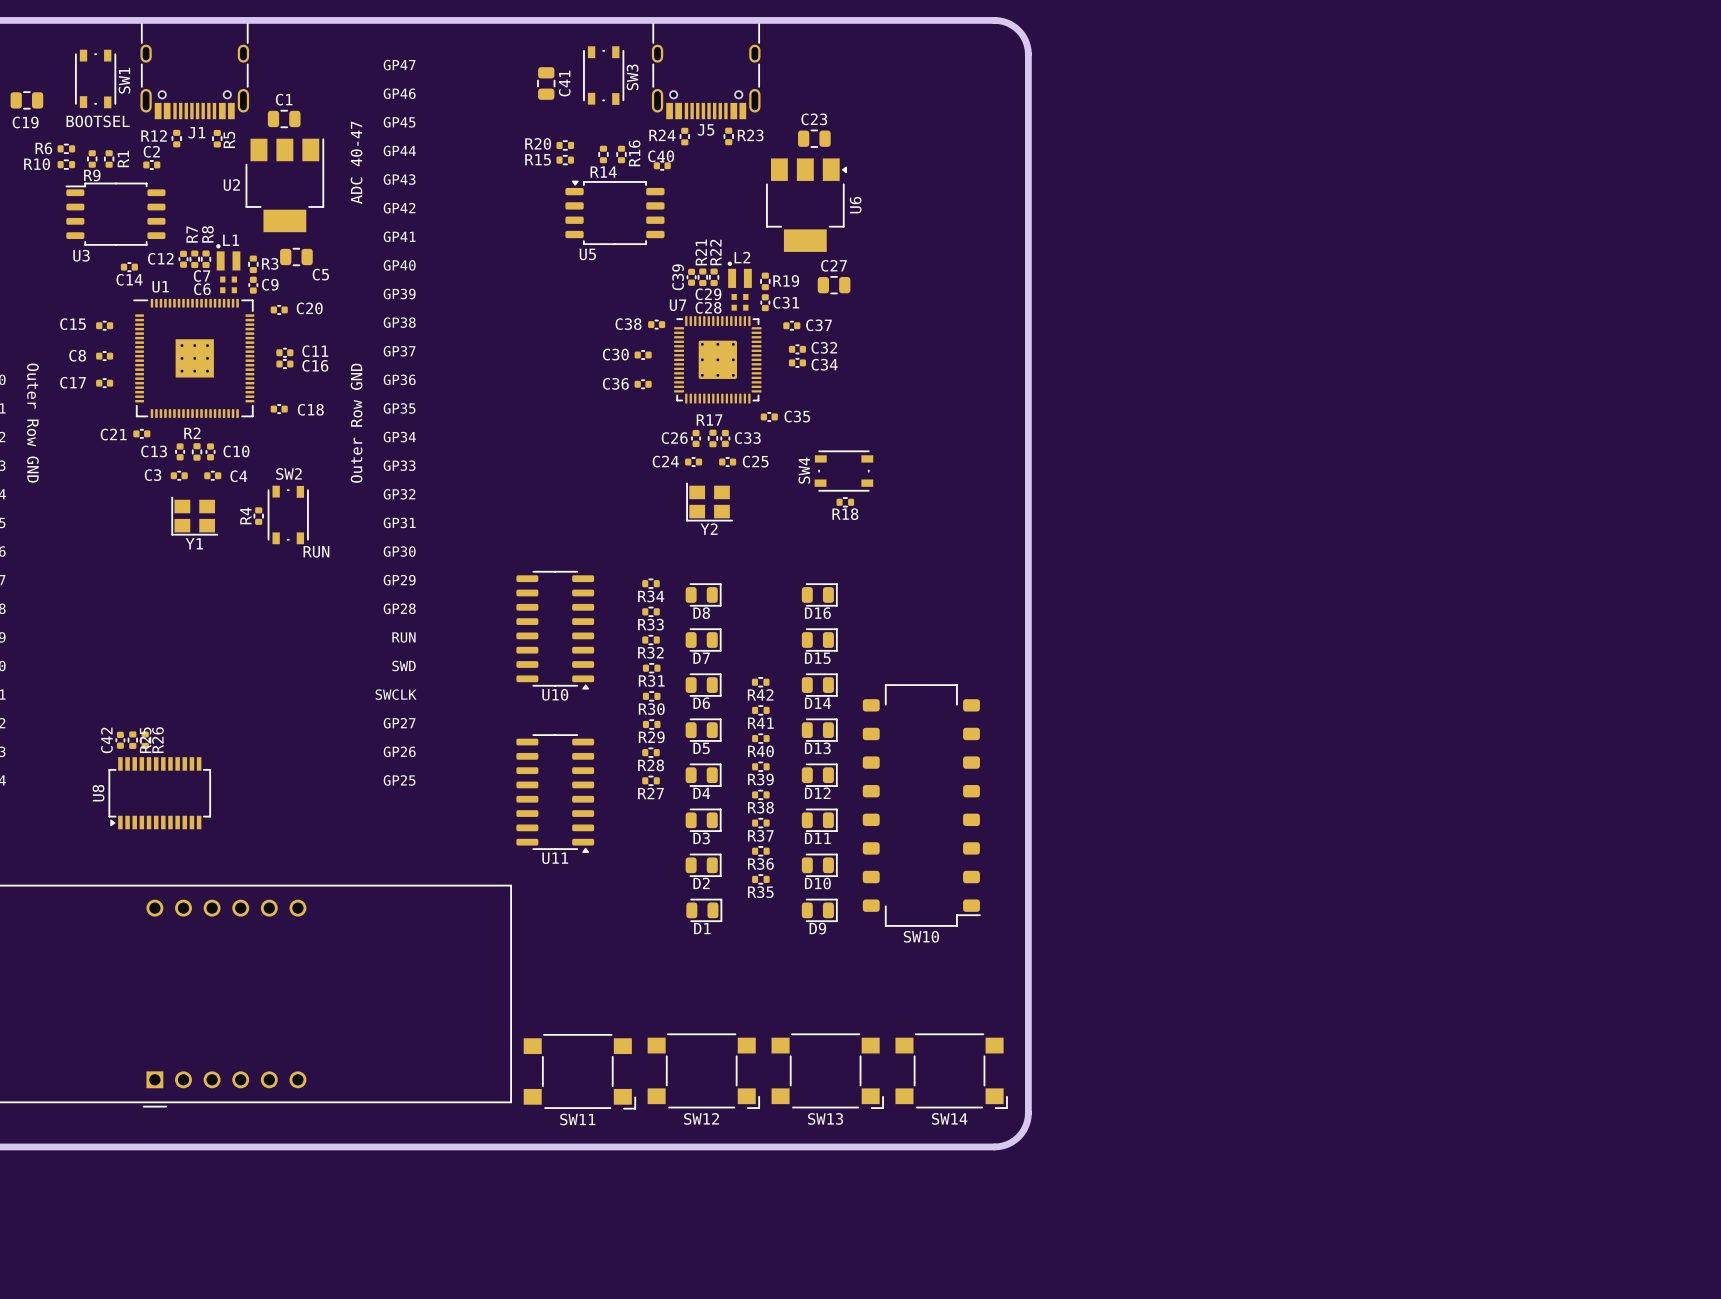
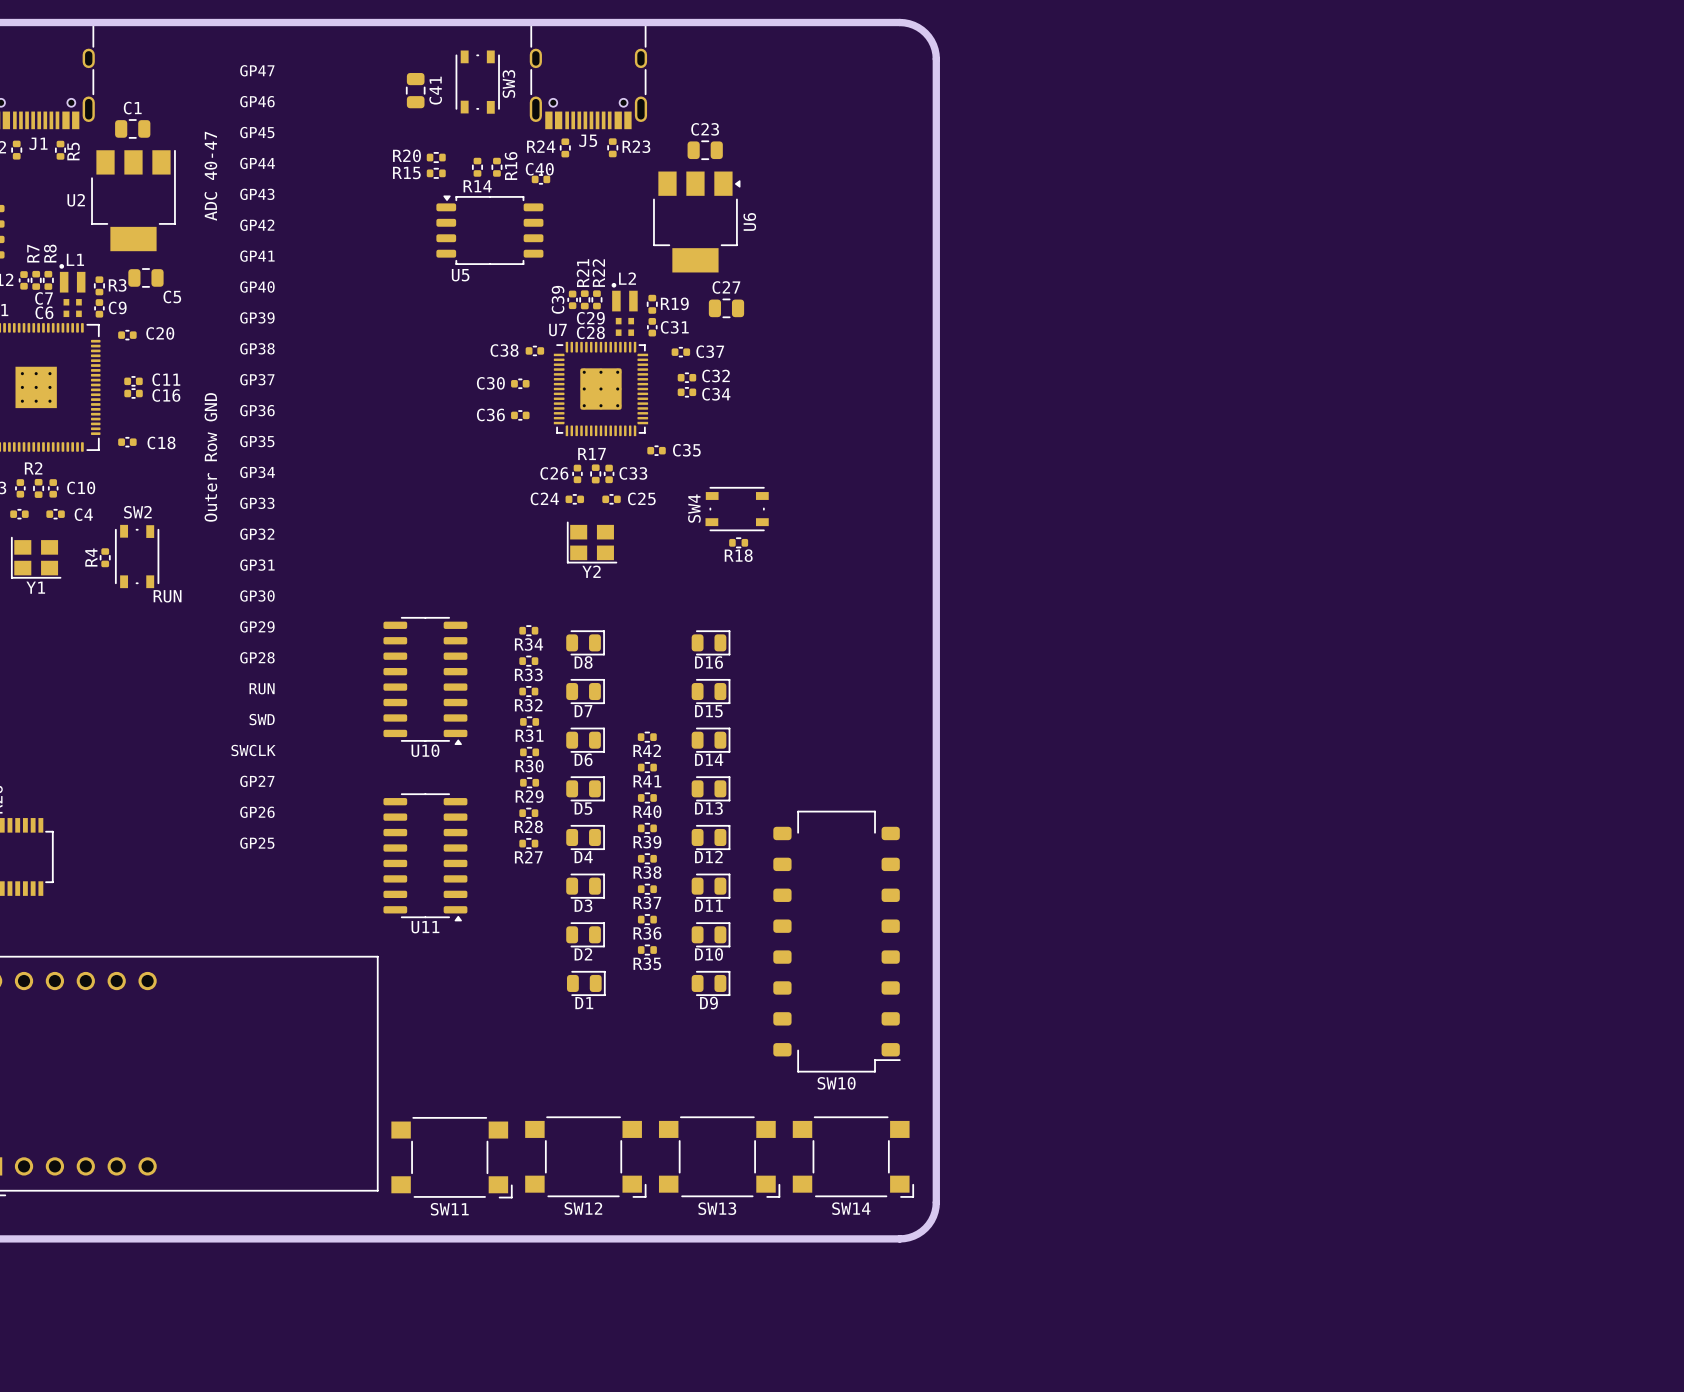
SW10 position: (921, 805) -> (836, 941)

